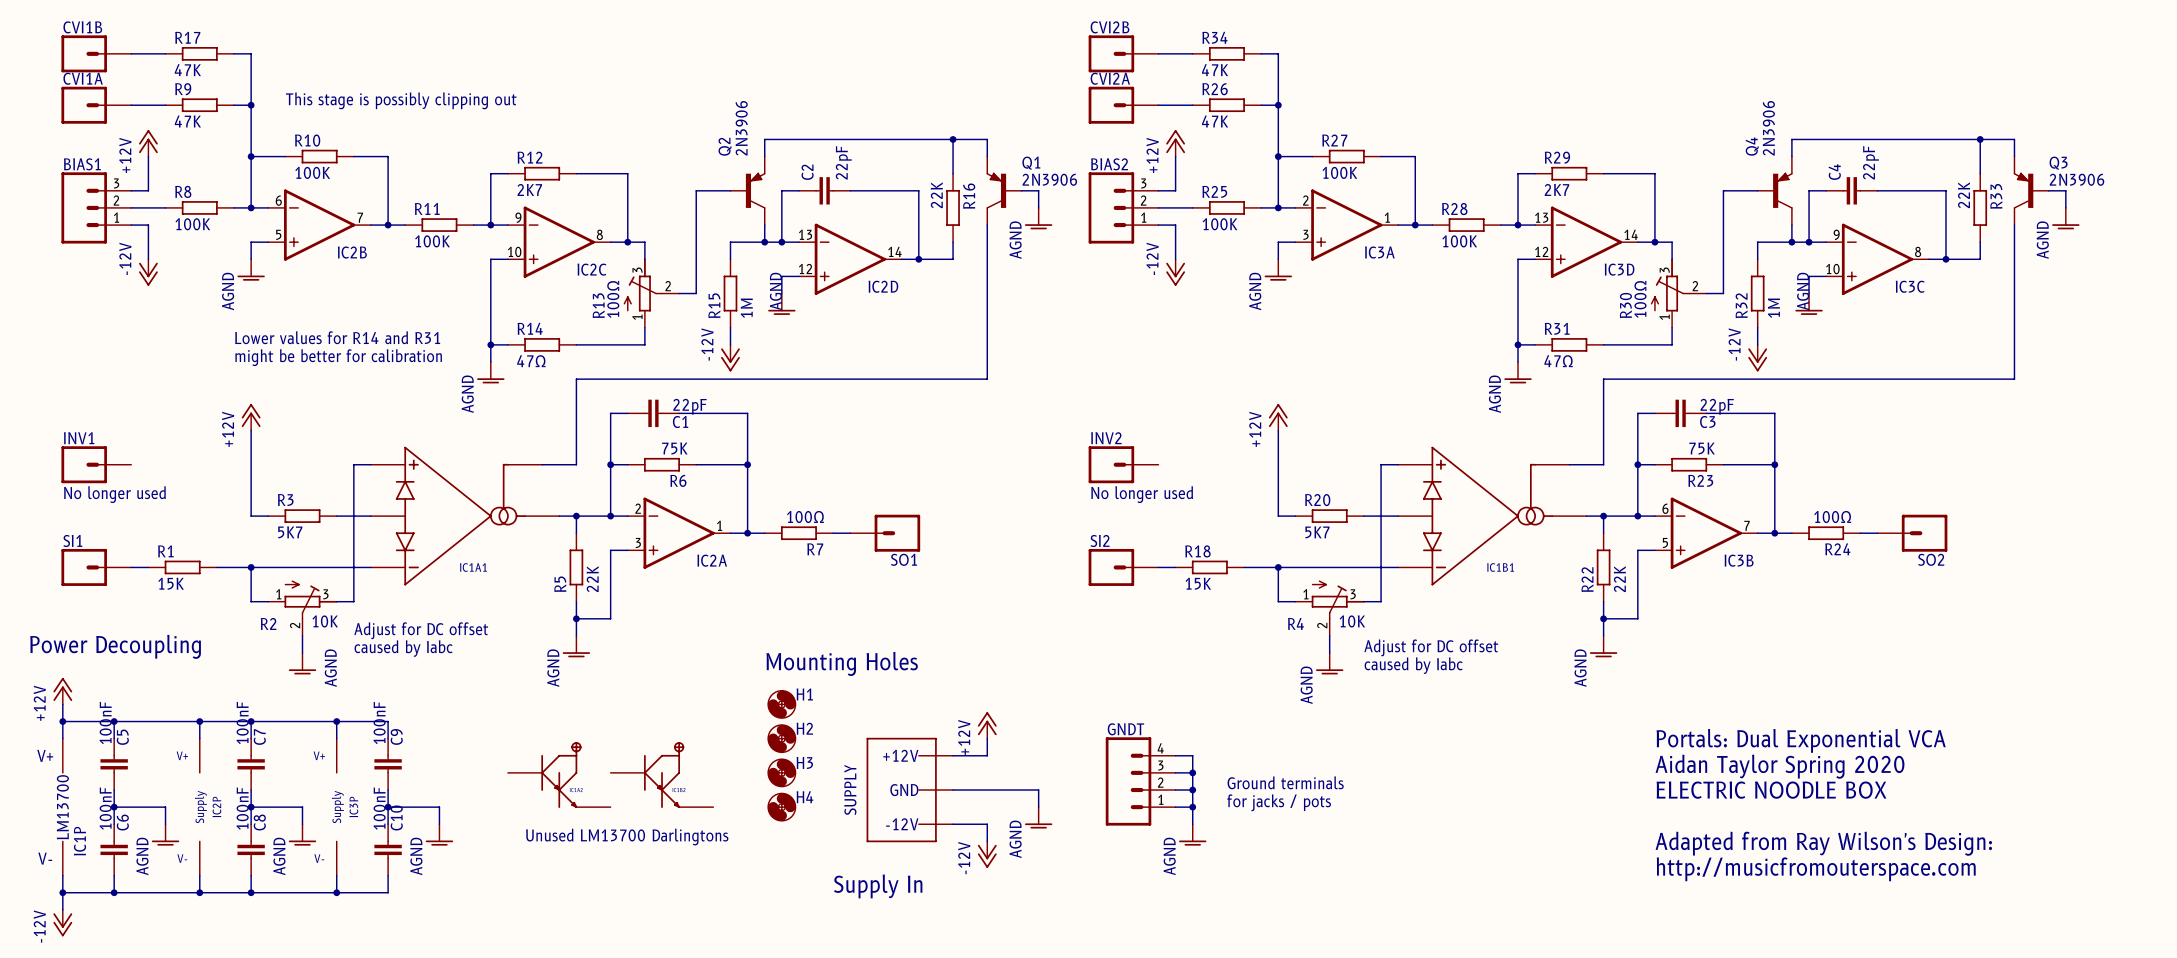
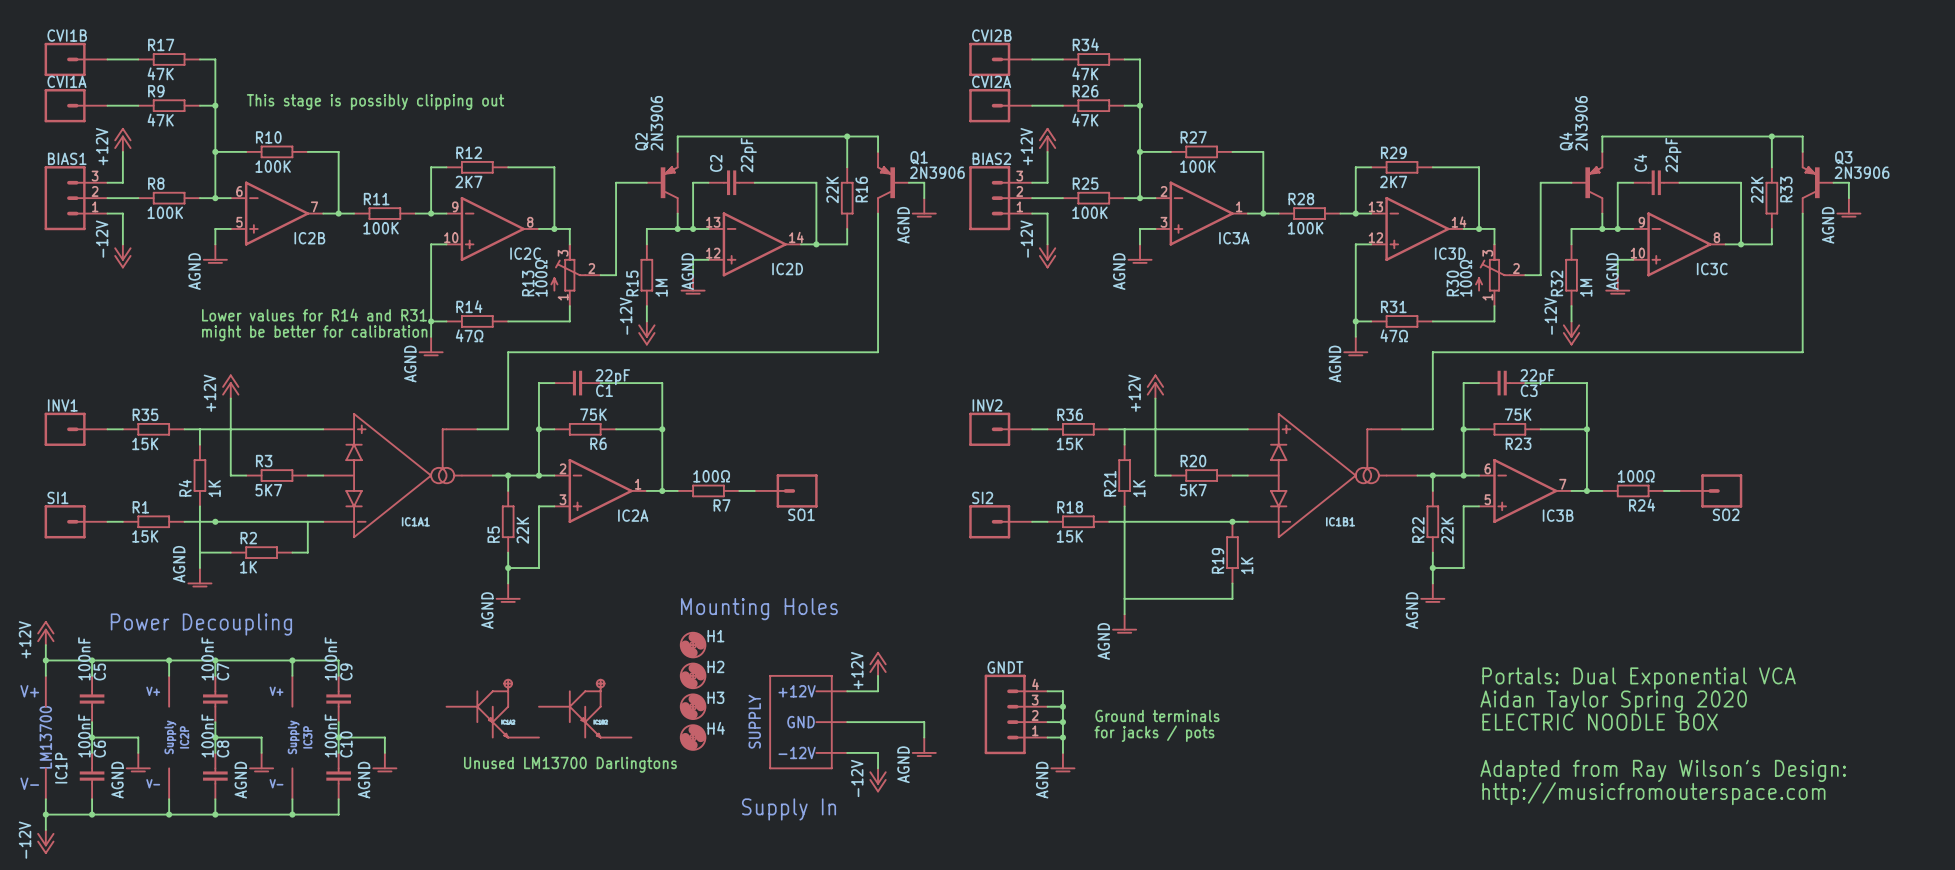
power symbol position: +12V (251, 417) -> +12V (230, 386)
power symbol position: +12V (1278, 417) -> +12V (1155, 386)
wire: (251, 430) (251, 516) (268, 516) -> (230, 398) (230, 475) (246, 475)
wire: (1278, 430) (1278, 516) (1295, 516) -> (1155, 398) (1155, 475) (1170, 475)
wire: none -> (107, 429) (122, 429)
R35: none -> 15K (153, 429)
wire: none -> (199, 429) (199, 444)
wire: (353, 464) (353, 567) -> (307, 429) (184, 429)
wire: none -> (1032, 429) (1047, 429)
R36: none -> 15K (1078, 429)
wire: none -> (1124, 429) (1124, 444)
wire: (1381, 464) (1381, 601) (1363, 601) -> (1232, 429) (1109, 429)
text: No longer used (114, 494) -> none
text: No longer used (1142, 494) -> none
R3 position: (302, 516) -> (277, 475)
R21: none -> 1K (1124, 475)
R20 position: (1329, 516) -> (1201, 475)
wire: none -> (199, 506) (199, 568)
wire: none -> (1124, 506) (1124, 614)
wire: (251, 567) (251, 601) -> (199, 552) (215, 552)
wire: (1278, 567) (1278, 601) (1295, 601) -> none
junction: (1278, 567) -> none
junction: none -> (1232, 521)
R2 symbol: [268, 580, 338, 636] -> [230, 546, 293, 559]
R4 symbol: [1295, 580, 1365, 636] -> [193, 444, 207, 507]
R19: none -> 1K (1232, 552)
R2 value: 10K (325, 621) -> 1K (248, 567)
R4 value: 10K (1352, 621) -> 1K (214, 488)
R2 name position: R2 (268, 623) -> R2 (248, 538)
R4 name position: R4 (1295, 623) -> R4 (185, 488)
text: Adjust for DC offset (421, 630) -> none
wire: (302, 635) (302, 653) -> none
wire: (1329, 635) (1329, 653) -> none
wire: none -> (1232, 583) (1232, 598) (1124, 598)
text position: Power Decoupling (115, 646) -> Power Decoupling (201, 624)
text: Adjust for DC offset (1431, 647) -> none
text: caused by Iabc (403, 648) -> none
power symbol position: AGND (302, 663) -> AGND (199, 577)
power symbol position: AGND (1329, 663) -> AGND (1124, 623)
text: caused by Iabc (1413, 665) -> none
power symbol text position: AGND (330, 668) -> AGND (179, 564)

